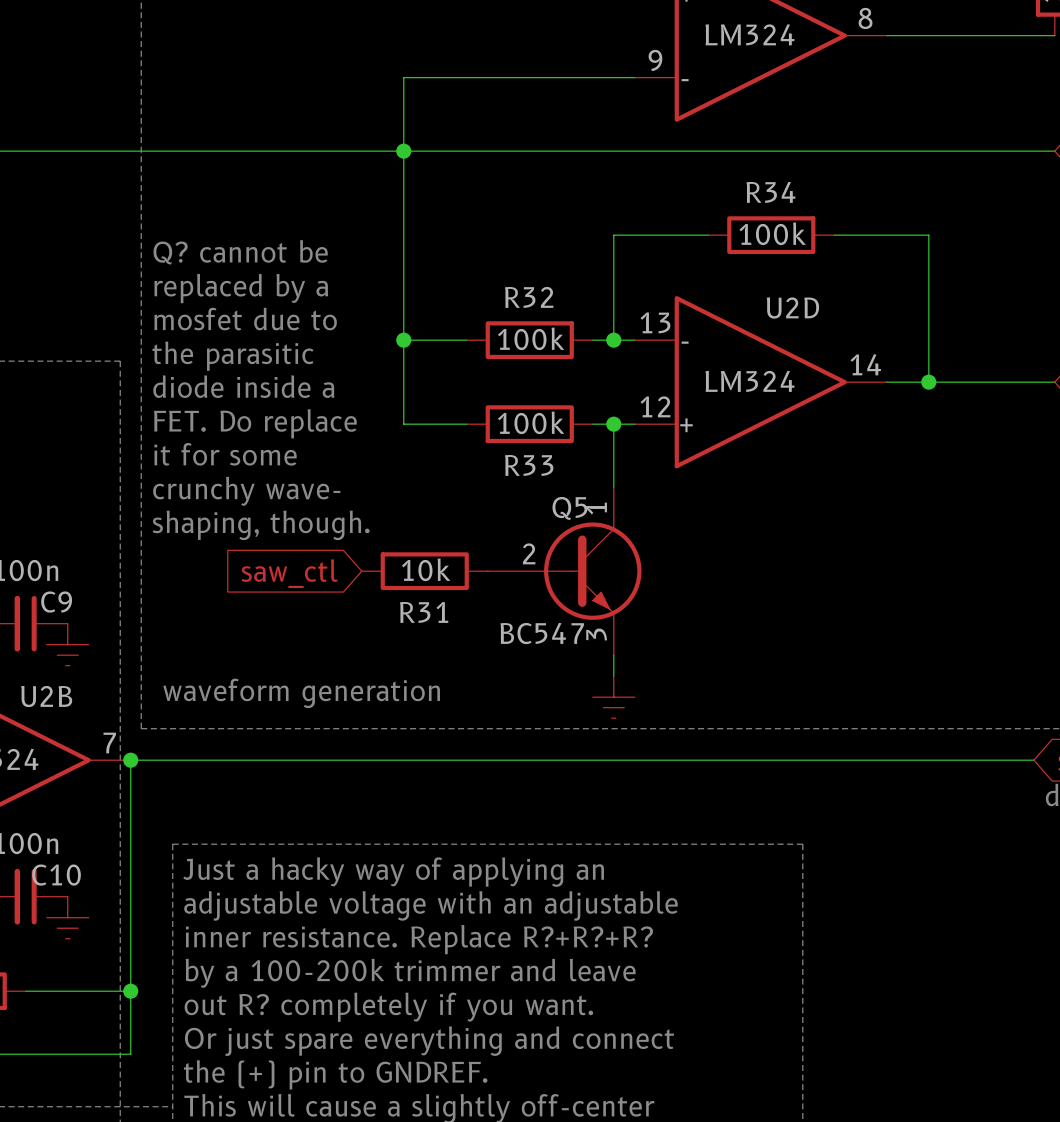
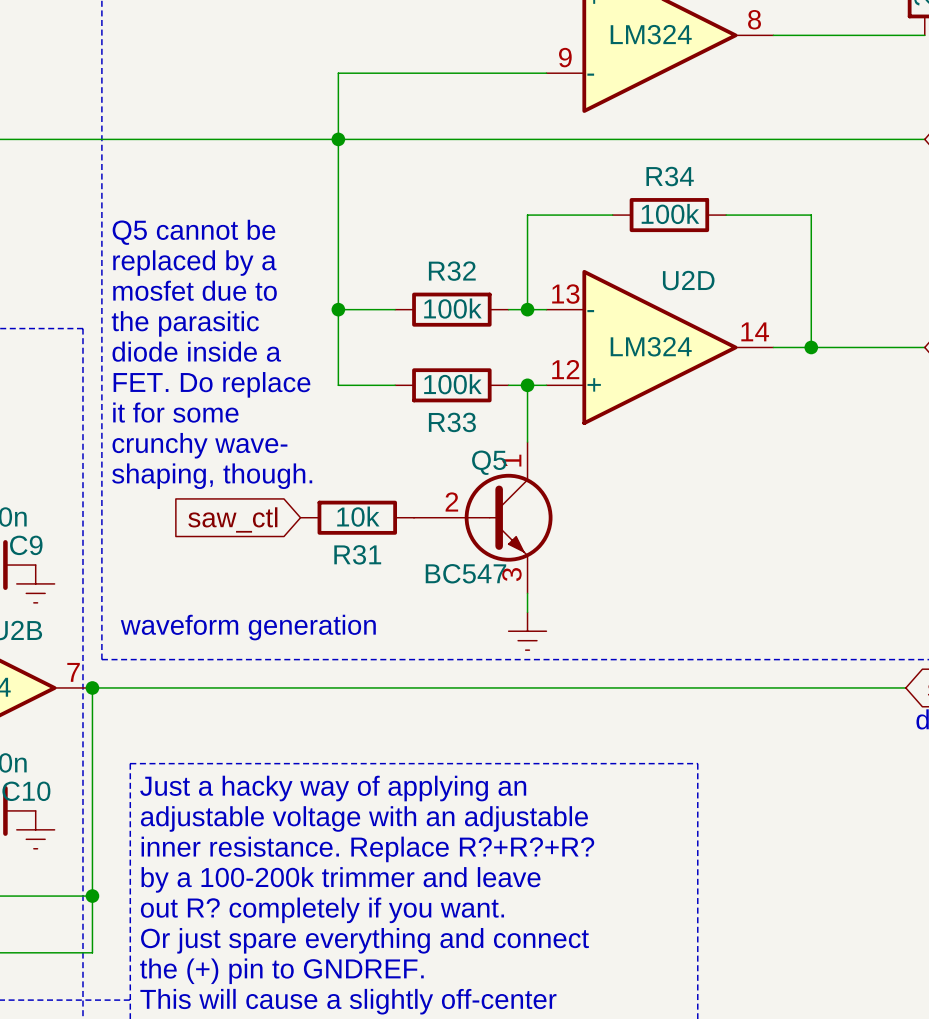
text: Q? cannot be (240, 252) -> Q5 cannot be (193, 232)

